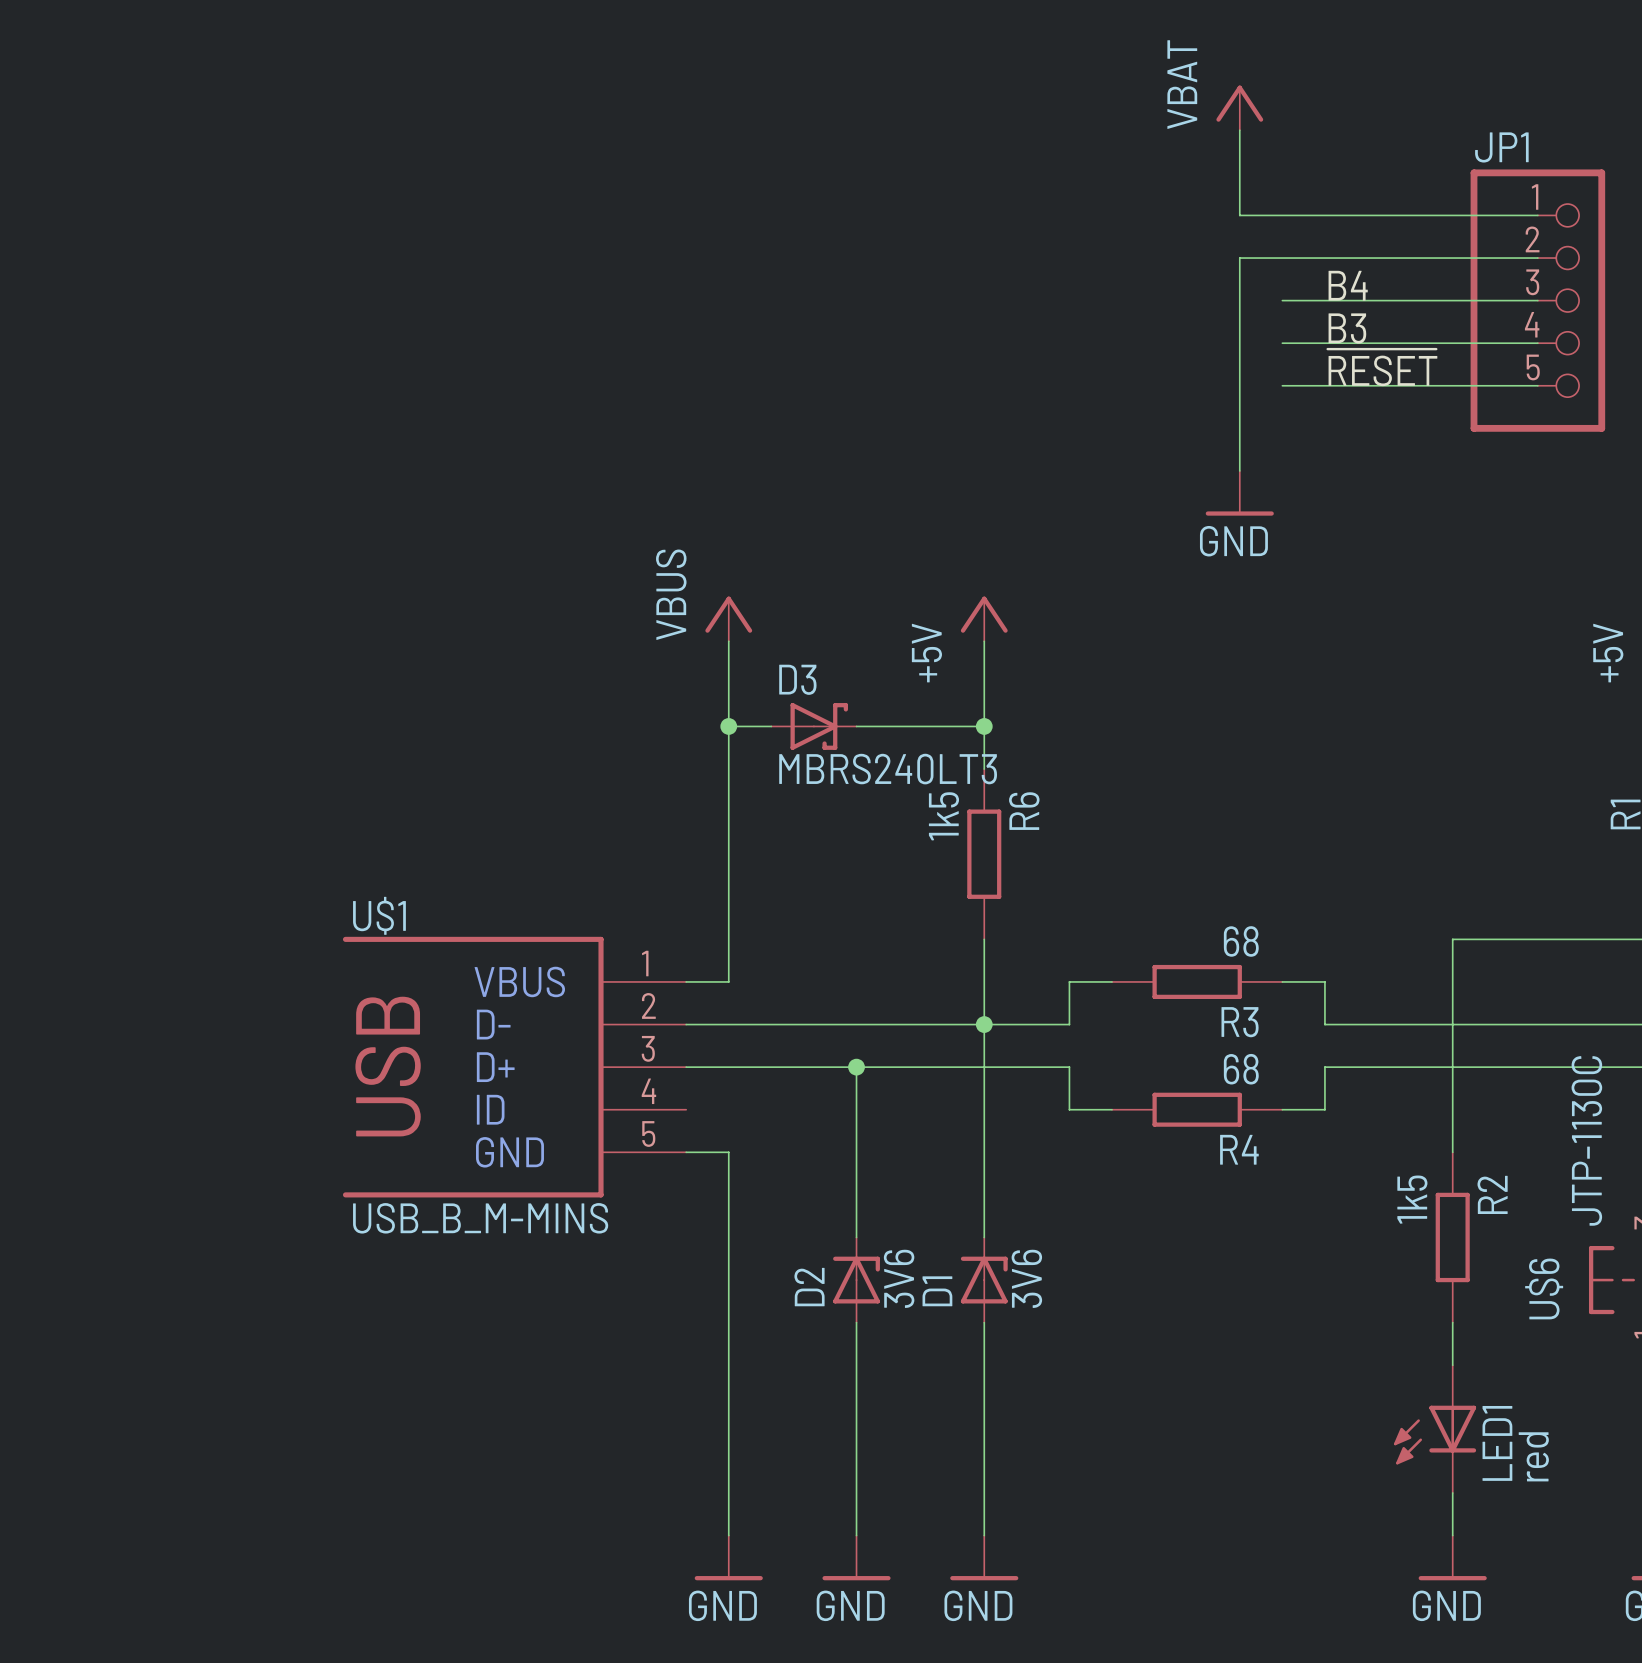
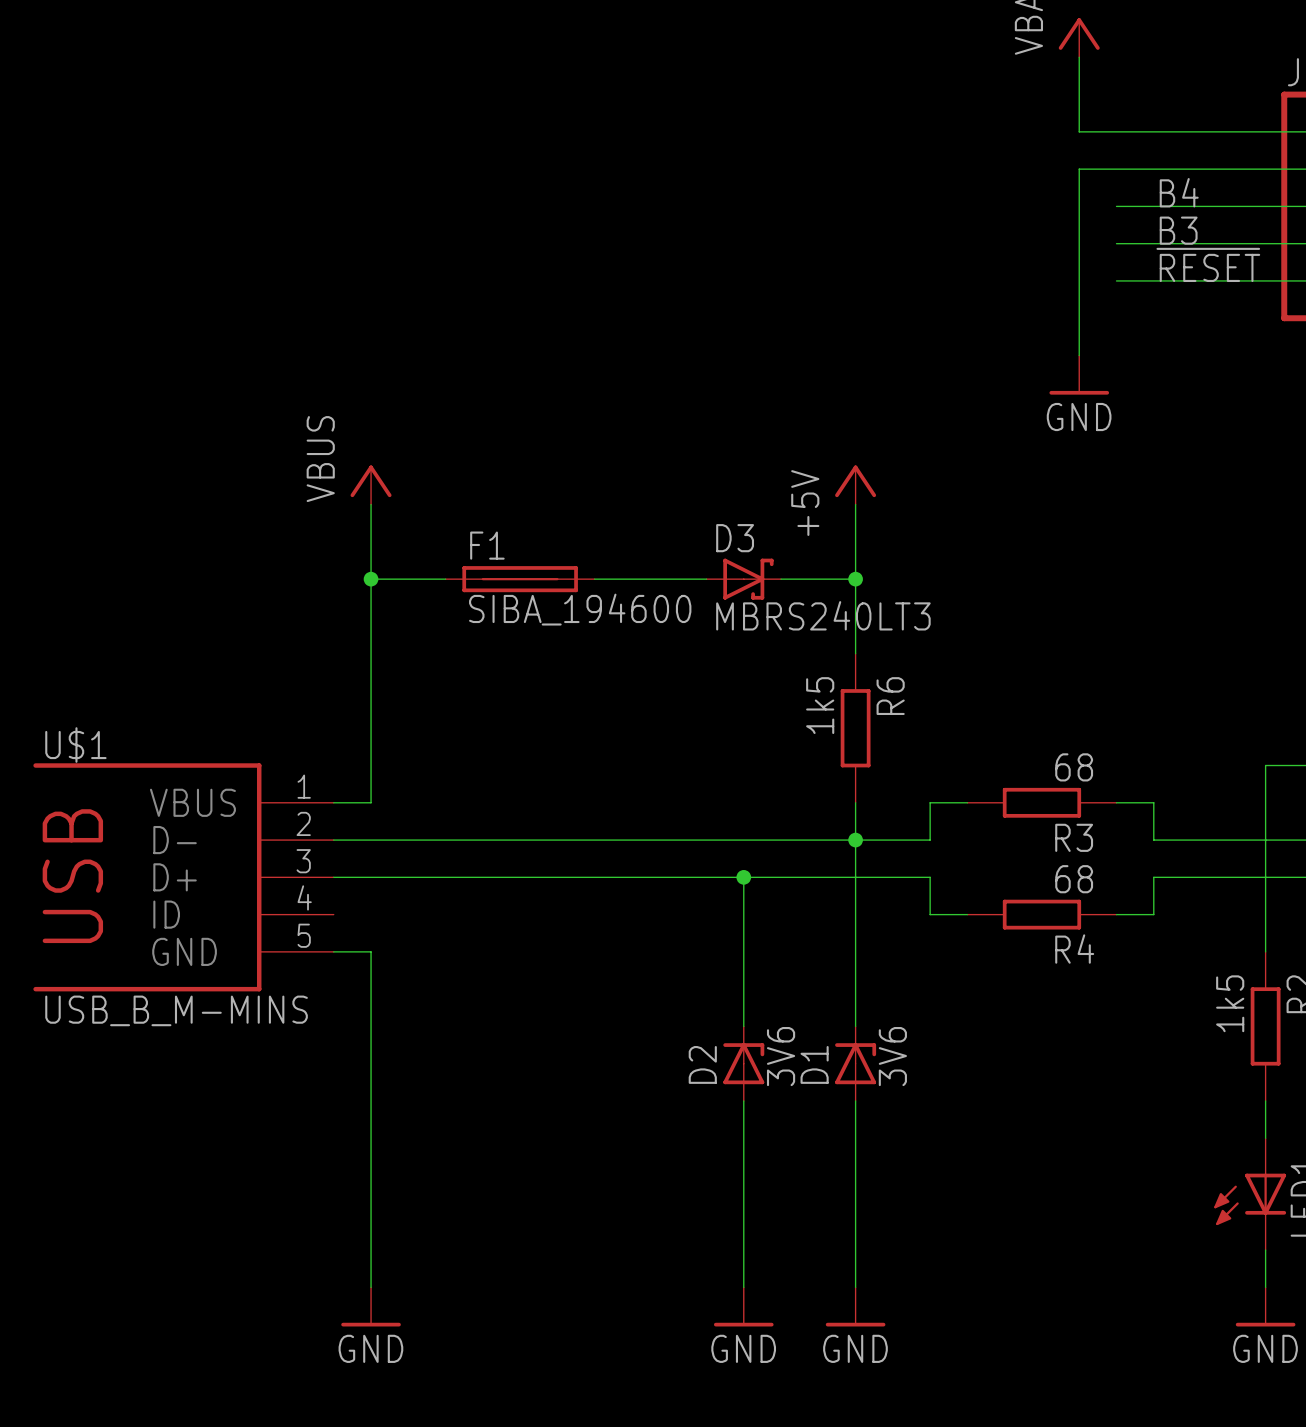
power symbol position: VBUS (728, 618) -> VBUS (371, 485)
wire: (728, 641) (728, 981) (686, 981) -> (371, 504) (371, 802) (333, 802)
wire: none -> (371, 579) (445, 579)
junction: none -> (371, 579)
F1: none -> SIBA_194600 (520, 579)
wire: none -> (594, 579) (631, 579)
junction: (728, 726) -> none
D3 position: (813, 726) -> (743, 579)
R6 position: (984, 854) -> (855, 728)
wire: none -> (333, 840) (594, 840)
wire: none -> (333, 877) (594, 877)
U$1 position: (514, 1067) -> (183, 877)
wire: (686, 1152) (728, 1152) (728, 1535) -> (333, 951) (371, 951) (371, 1287)
power symbol position: GND (728, 1557) -> GND (371, 1306)

